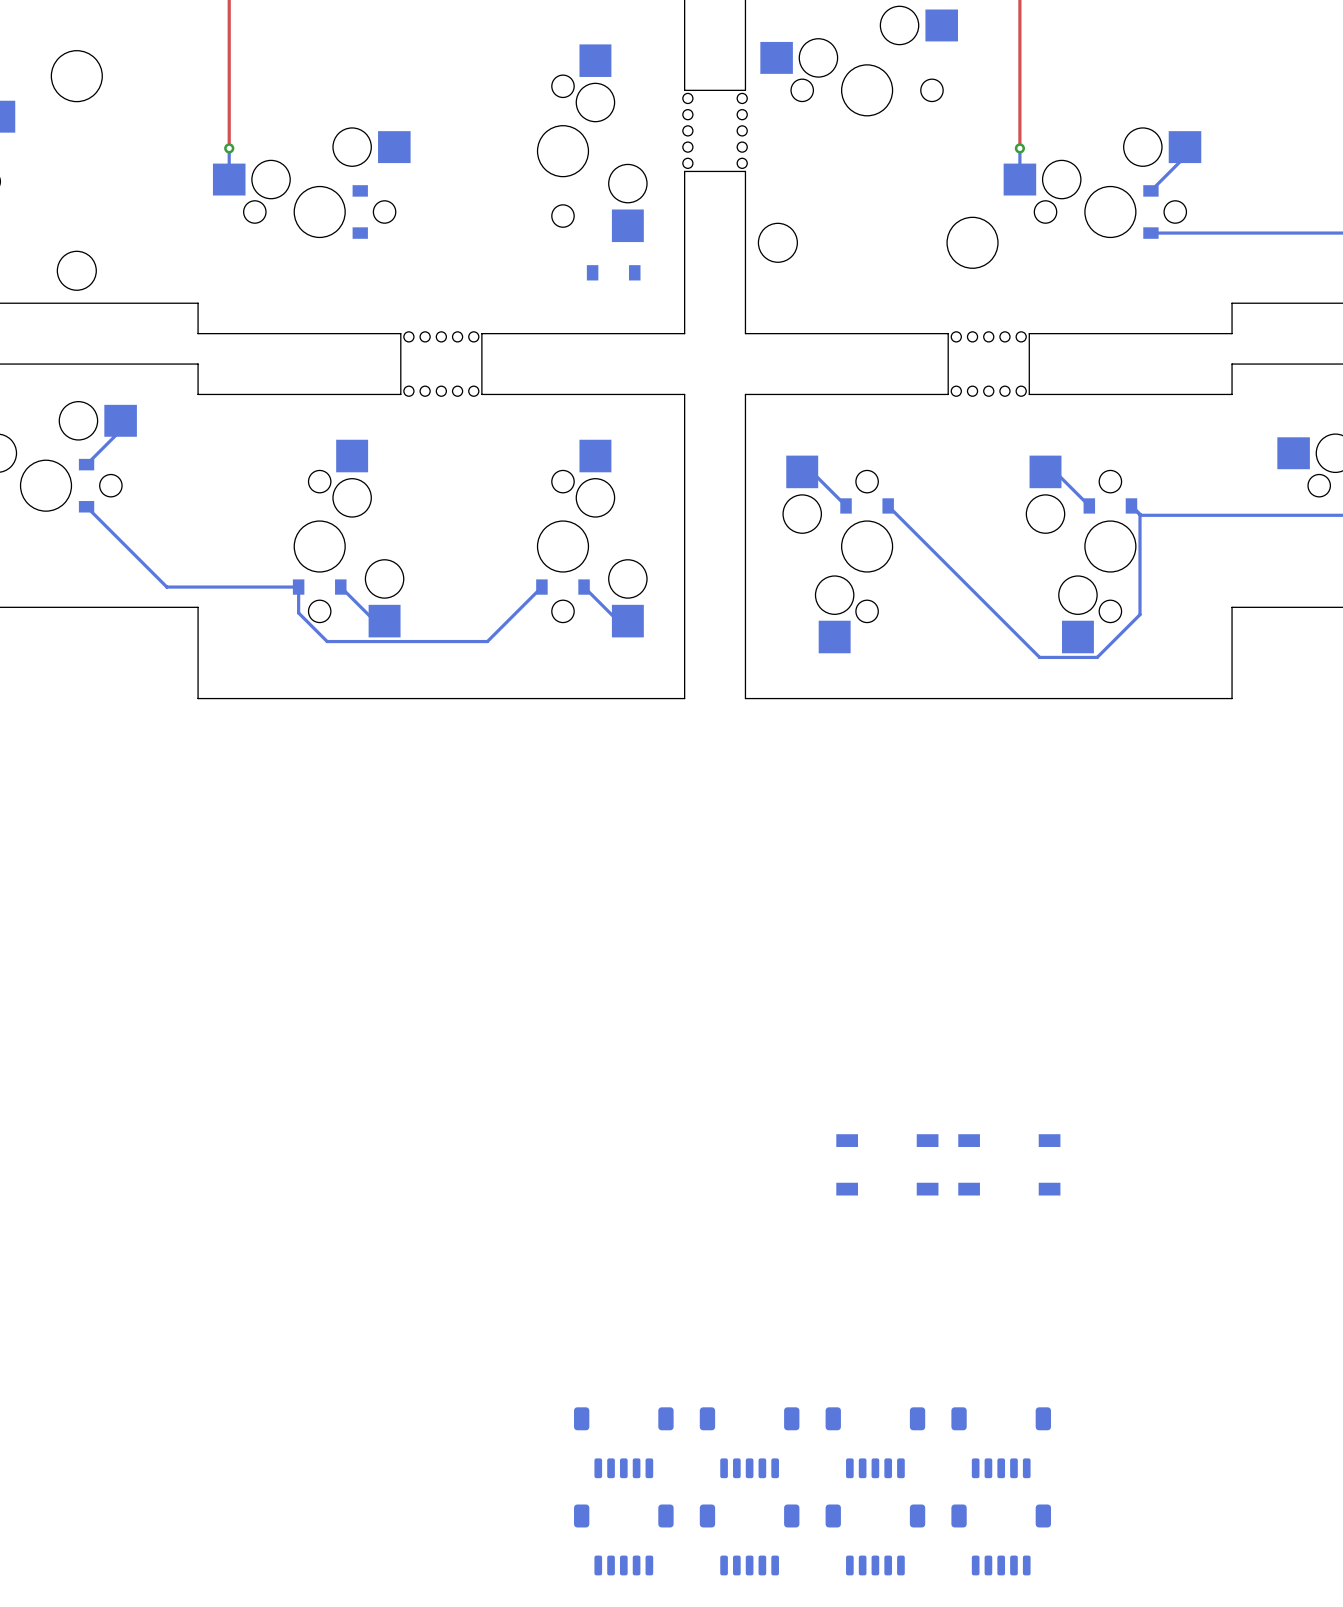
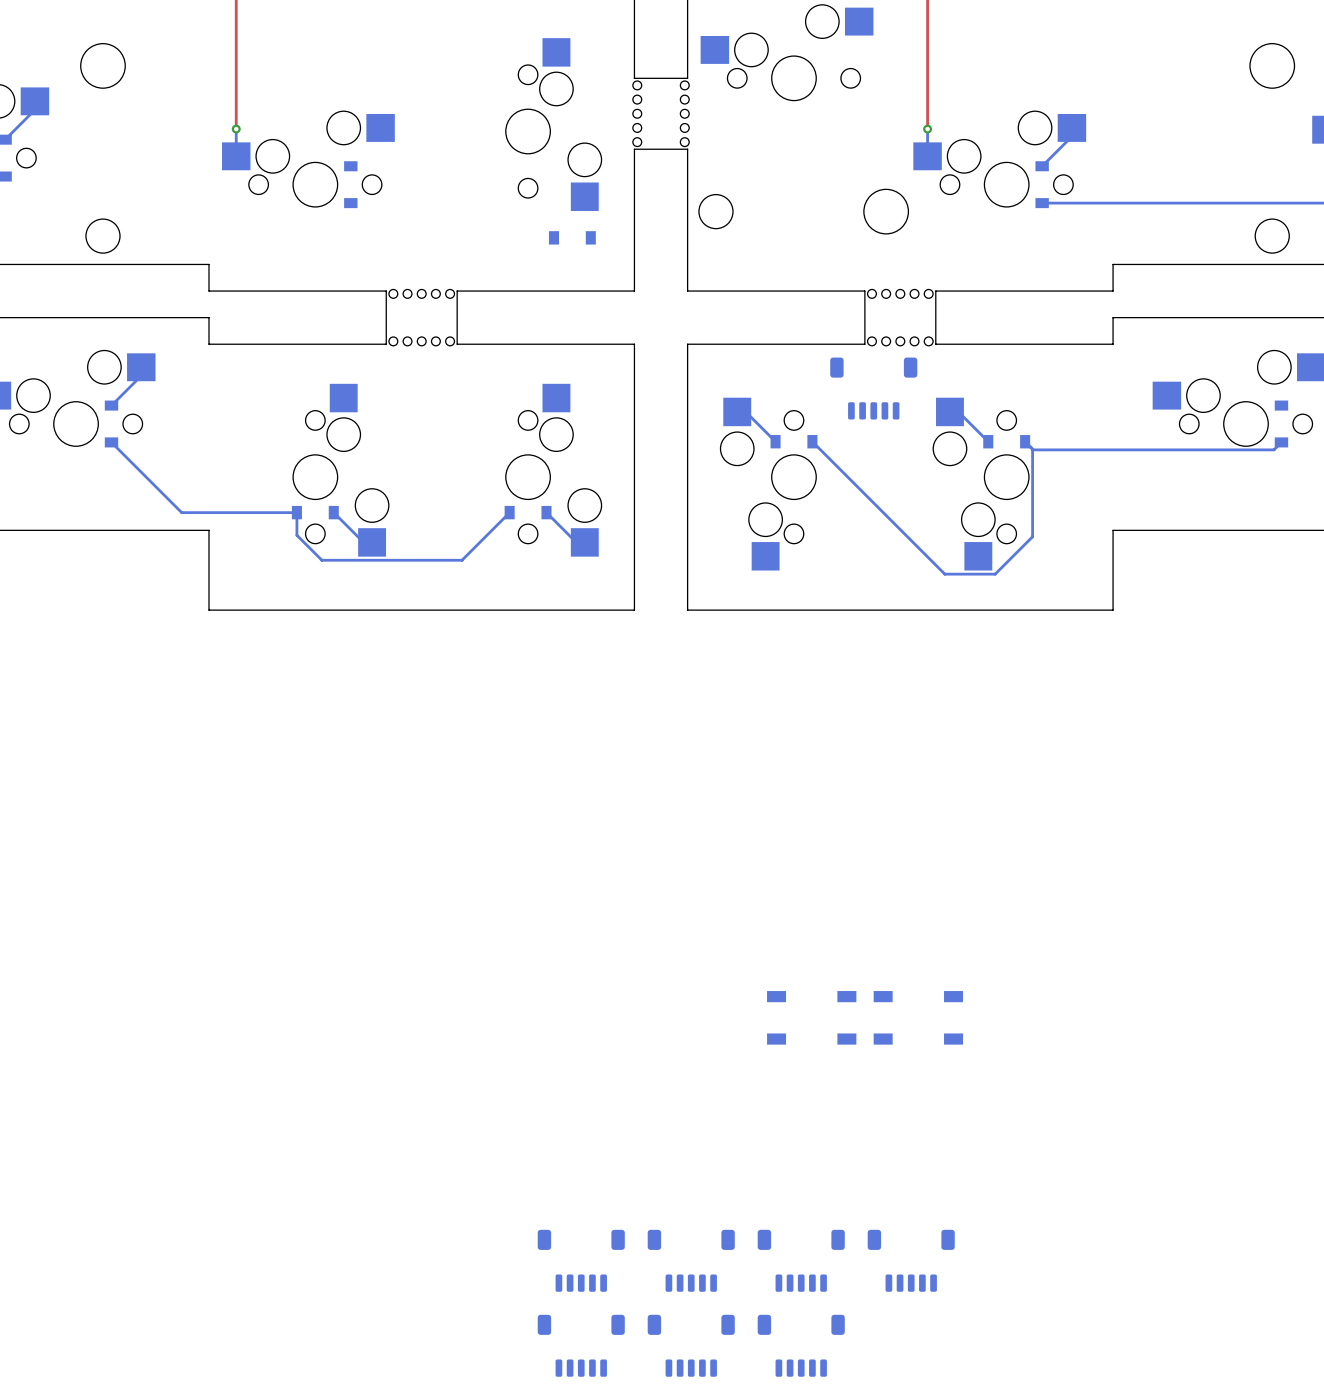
part: none -> (873, 388)
part: (1001, 1539) -> none

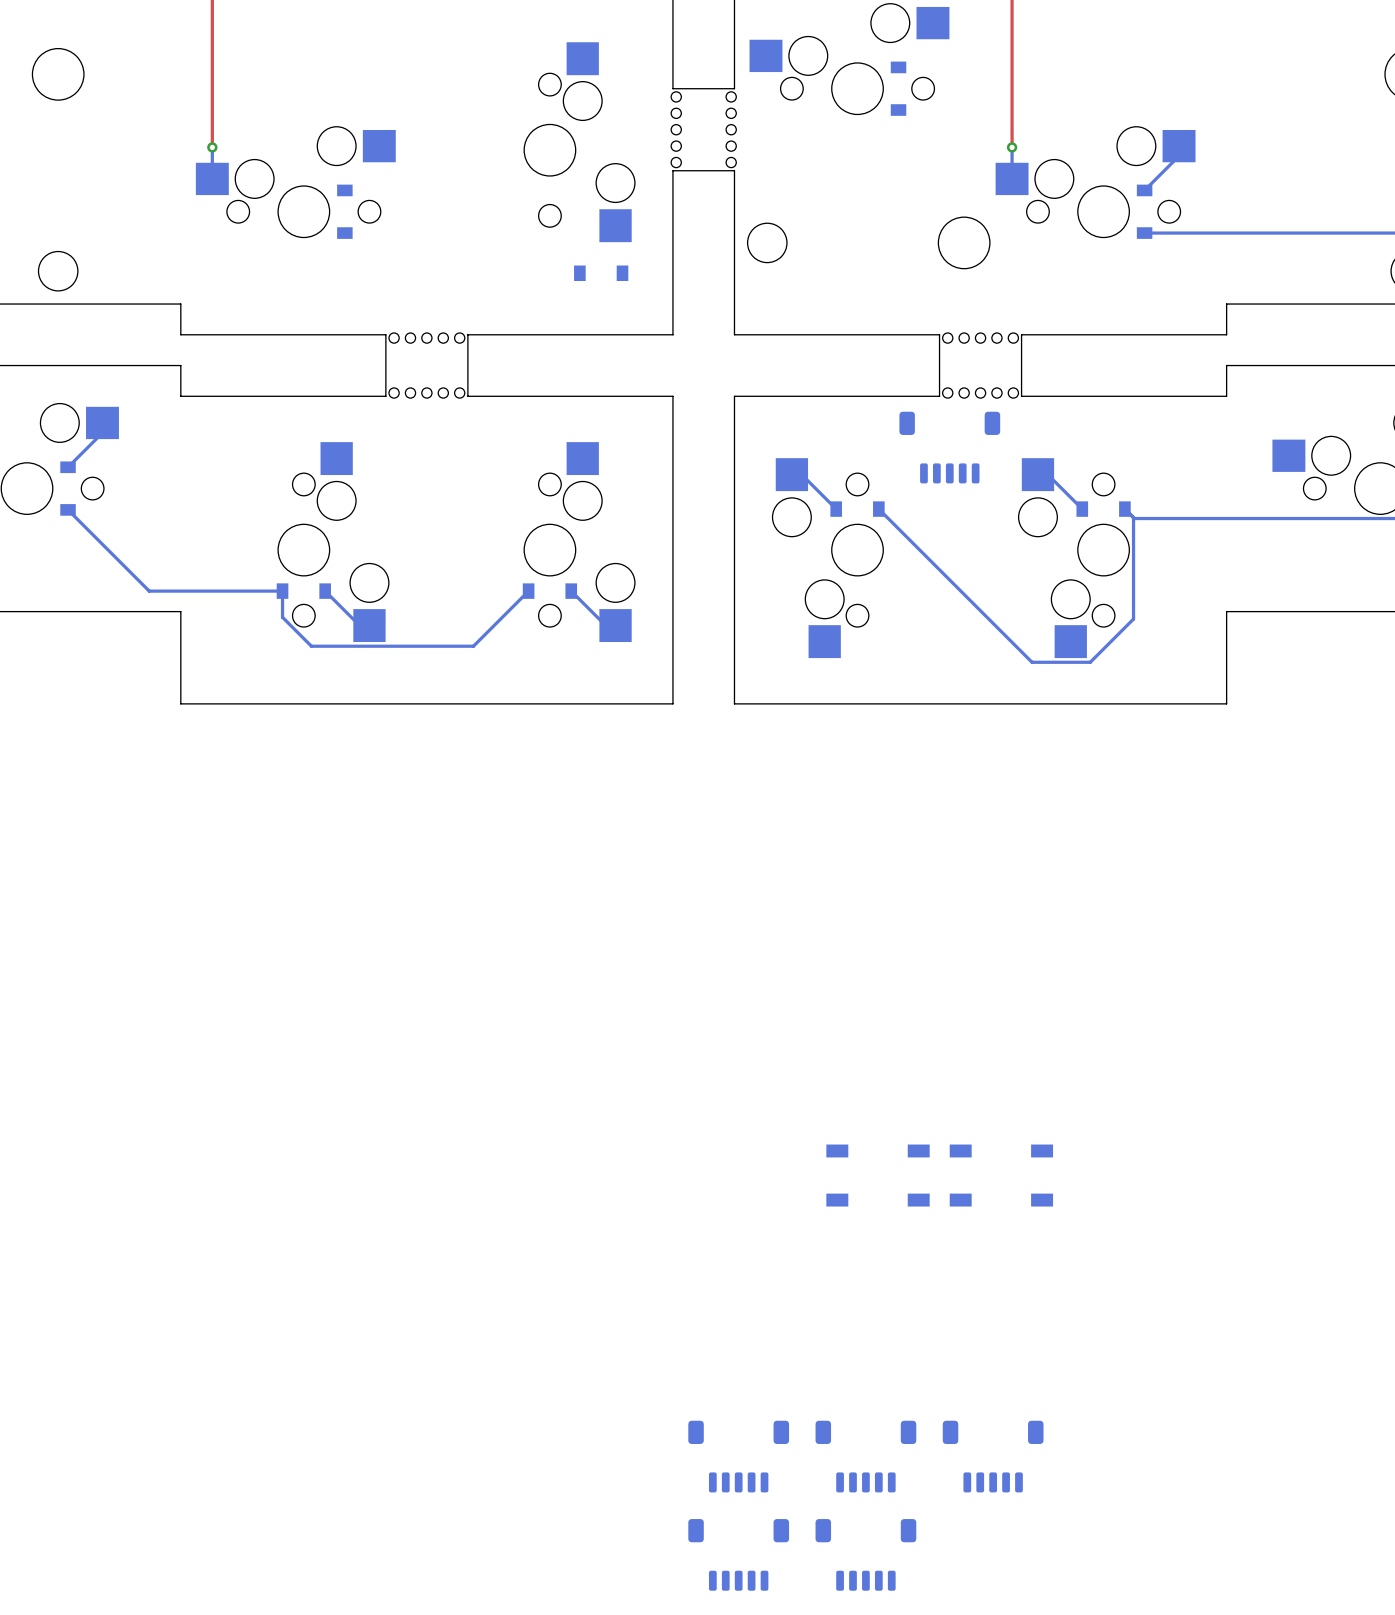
part: none -> (898, 88)
part: (581, 1260) -> none
part: (581, 1345) -> none

